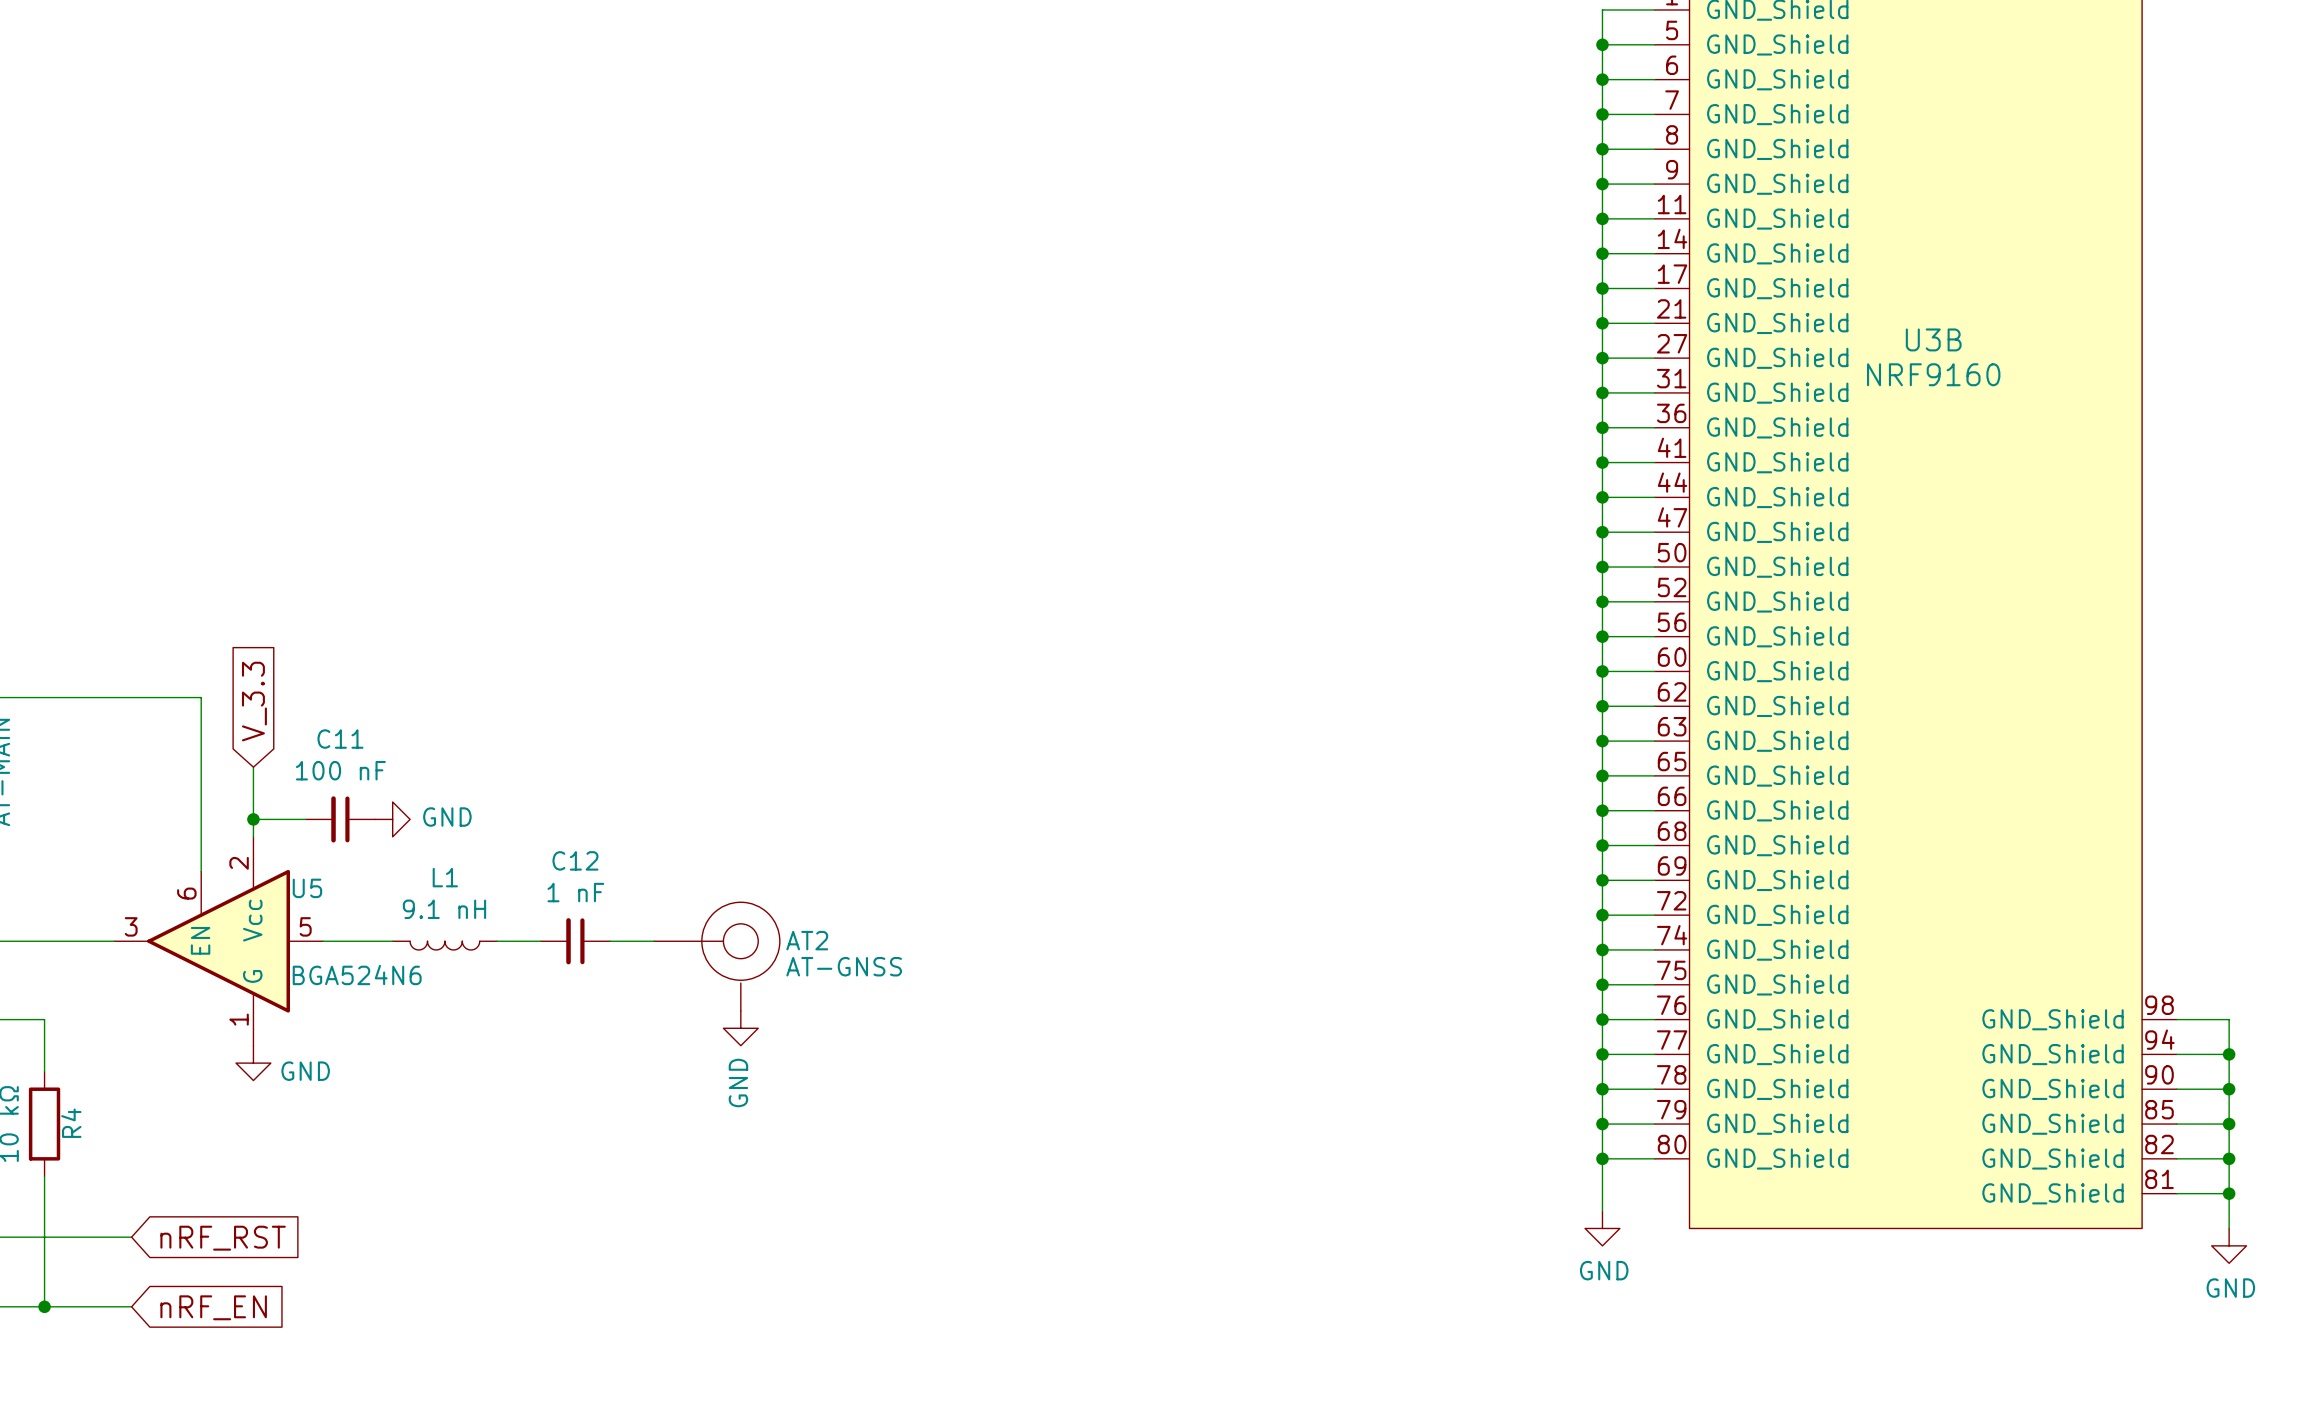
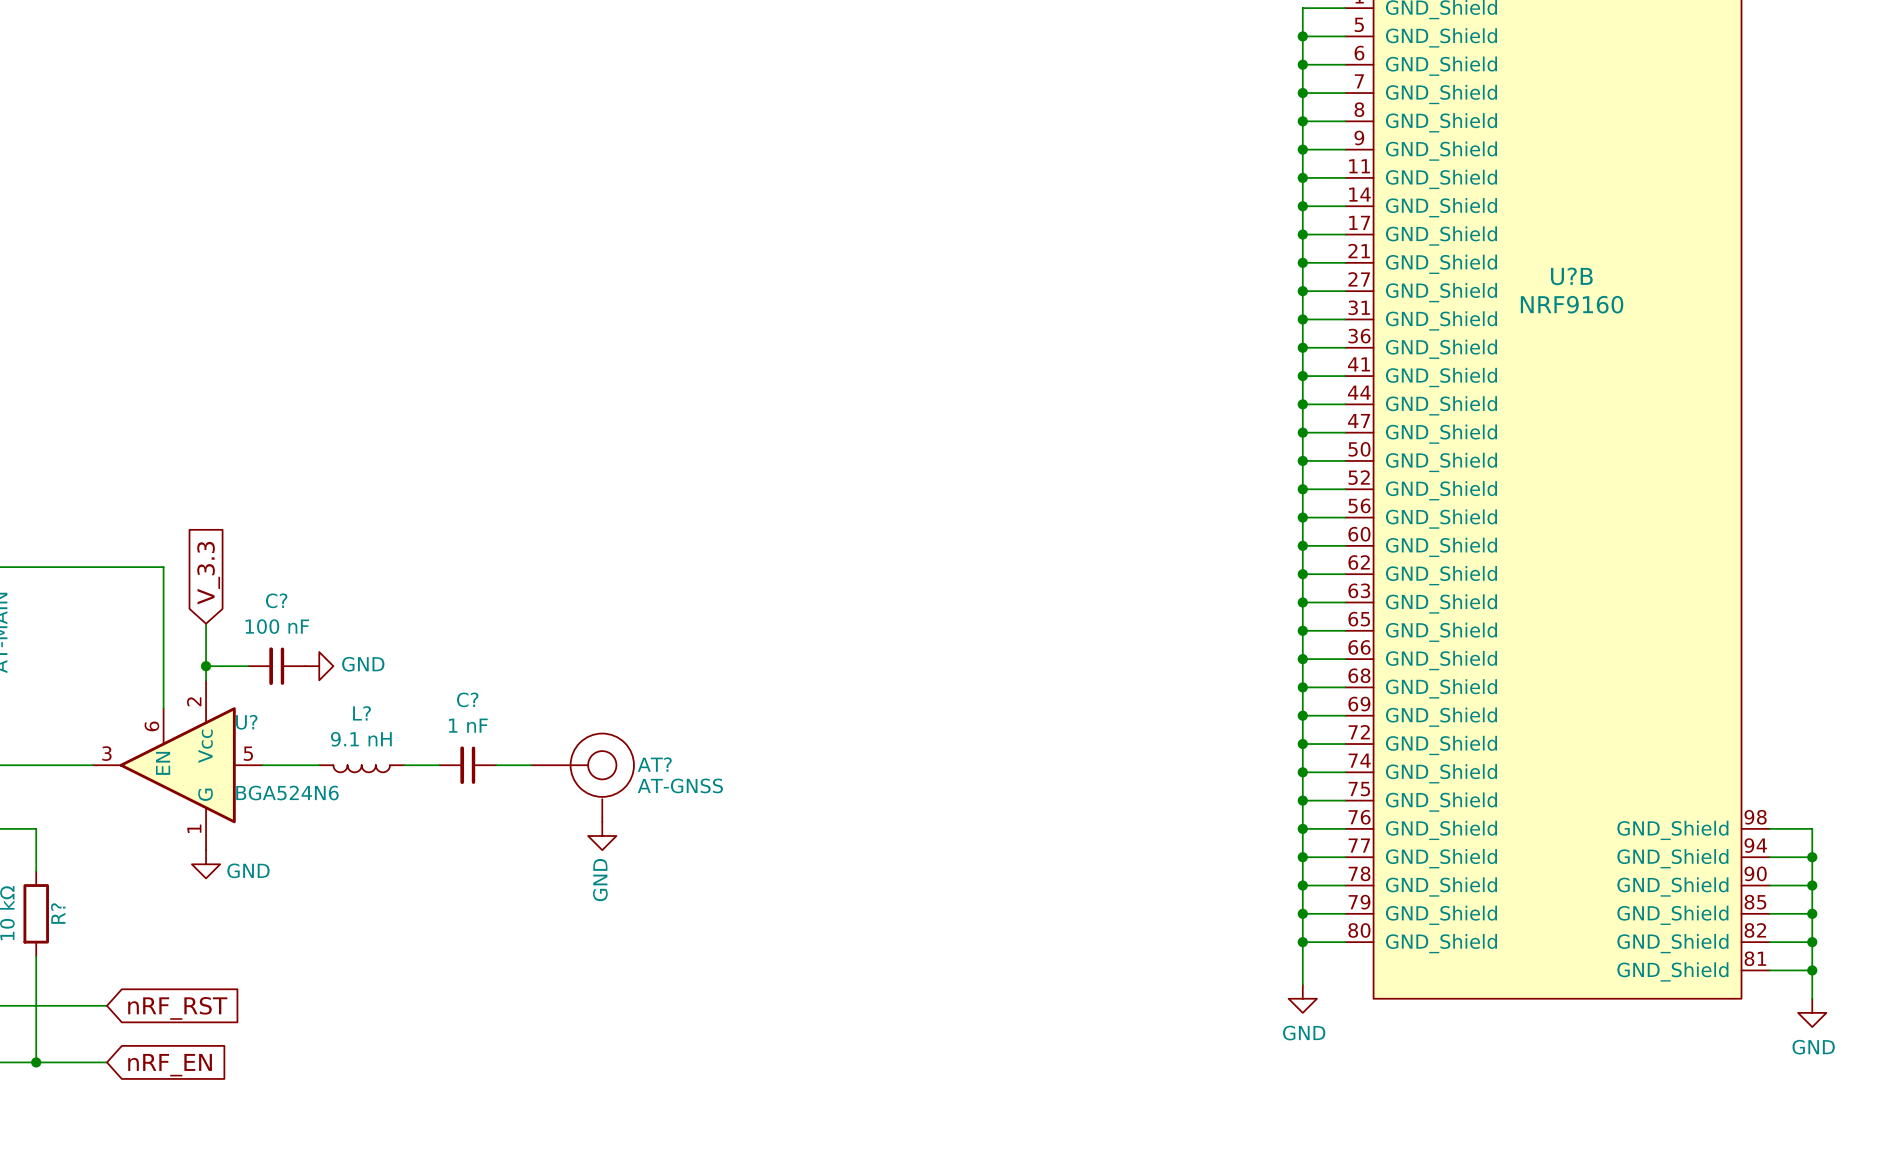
U3B name: U3B (1933, 339) -> U?B (1571, 276)
C11 name: C11 (340, 739) -> C? (276, 600)
C12 name: C12 (575, 860) -> C? (467, 699)
L1 name: L1 (445, 877) -> L? (361, 713)
U5 name: U5 (307, 888) -> U? (246, 722)
AT2 name: AT2 (807, 940) -> AT? (654, 764)
R4 name: R4 (71, 1123) -> R? (58, 913)

